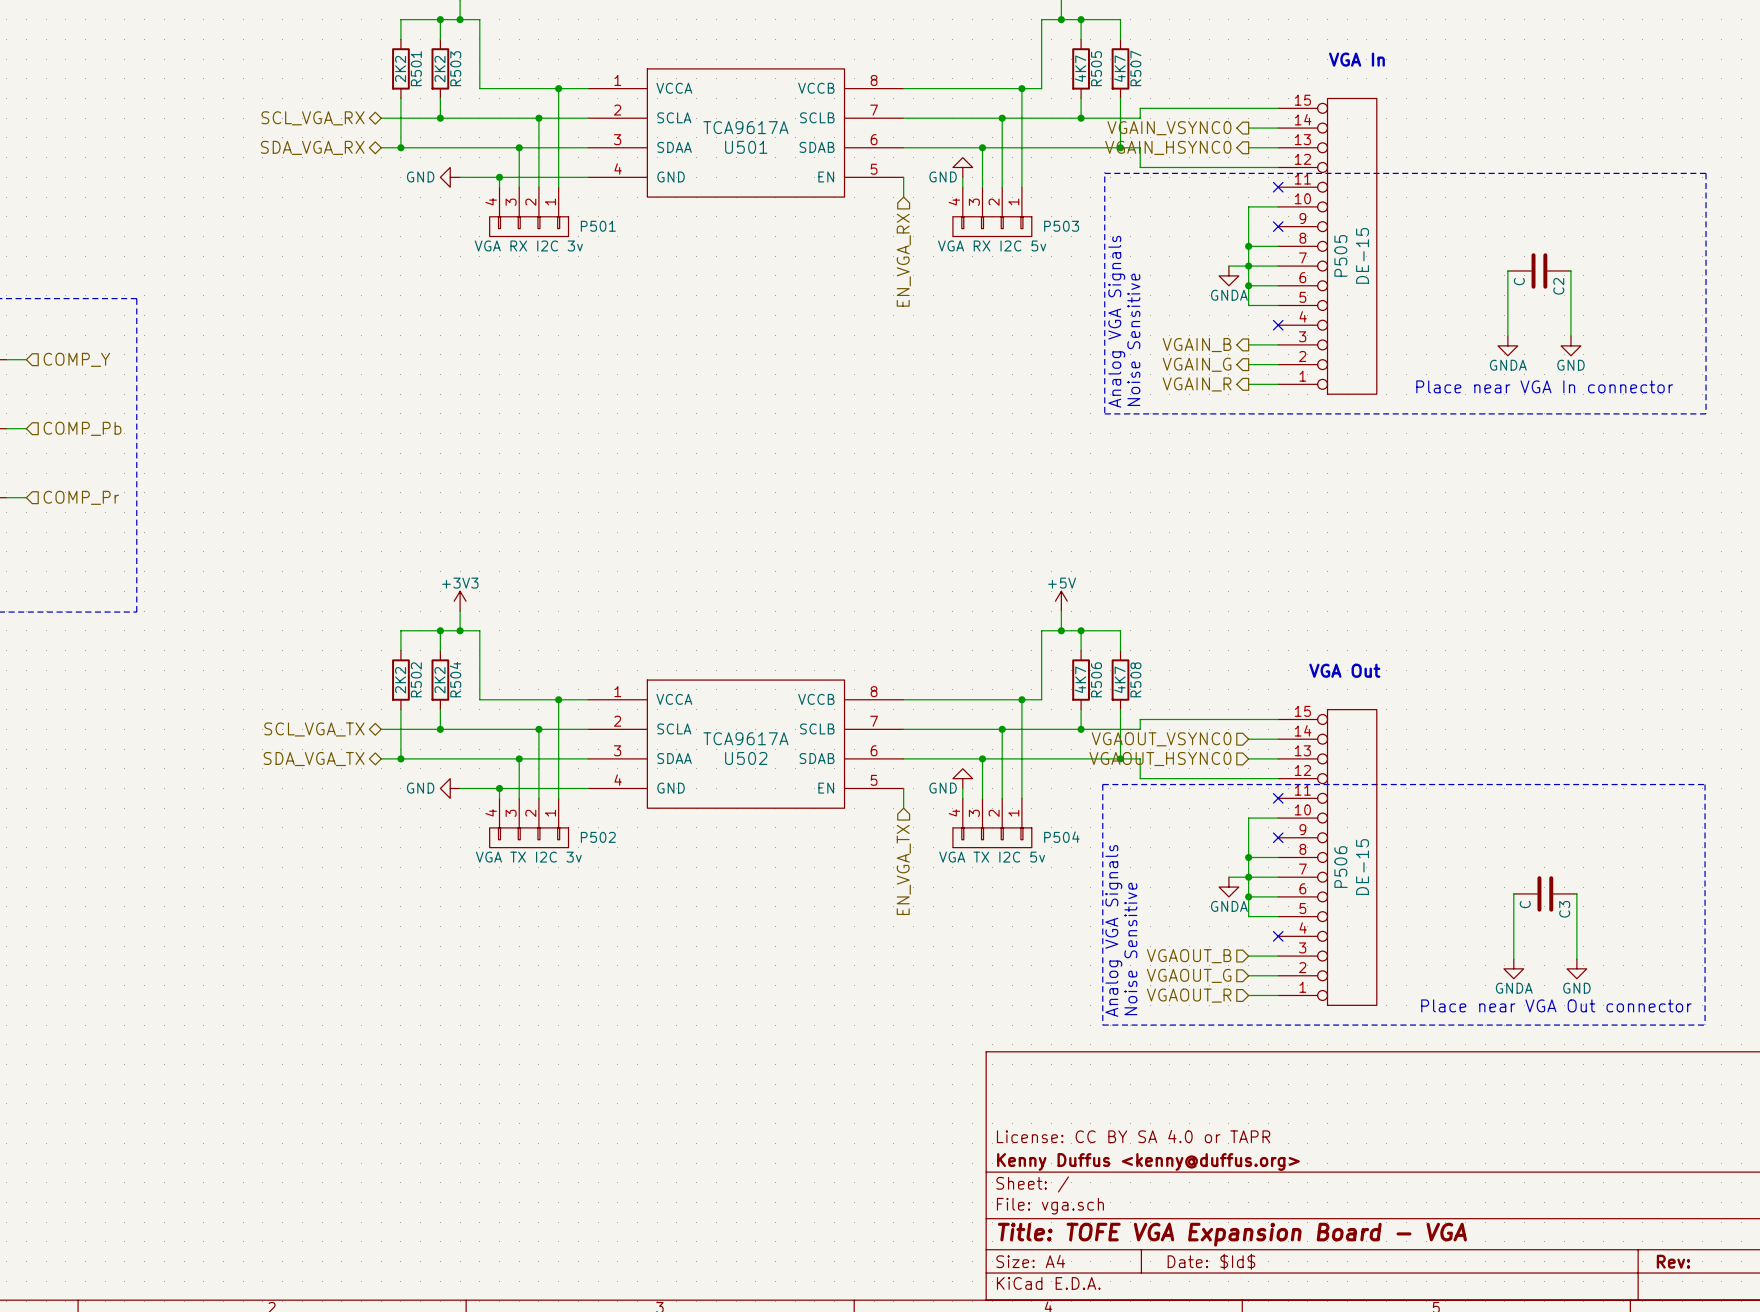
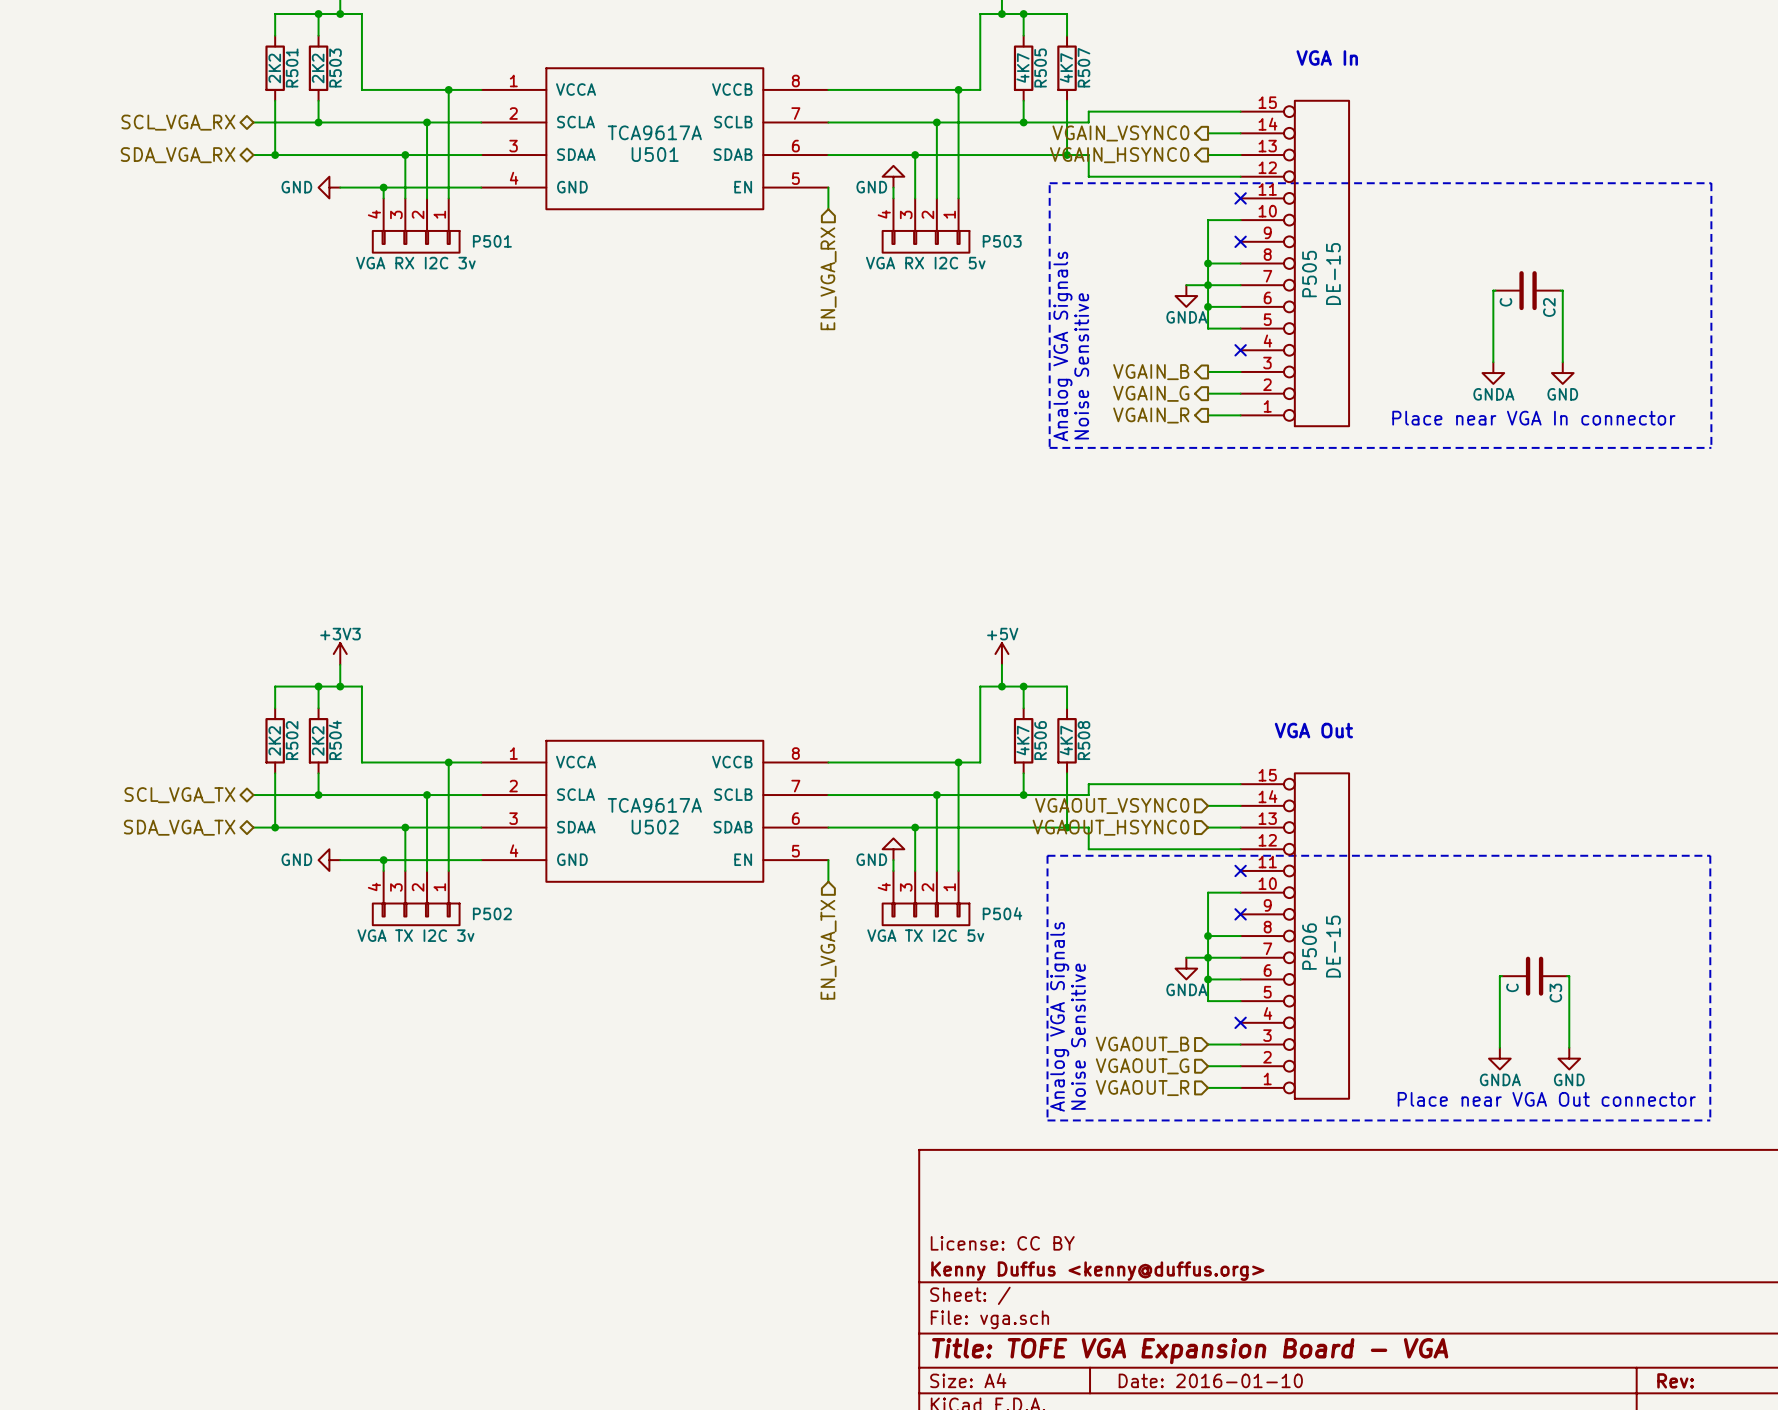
title block: License: CC BY SA 4.0 or TAPR (1133, 1136) -> License: CC BY (1002, 1243)
title block: Date: $Id$ (1211, 1261) -> Date: 2016-01-10 (1210, 1380)

